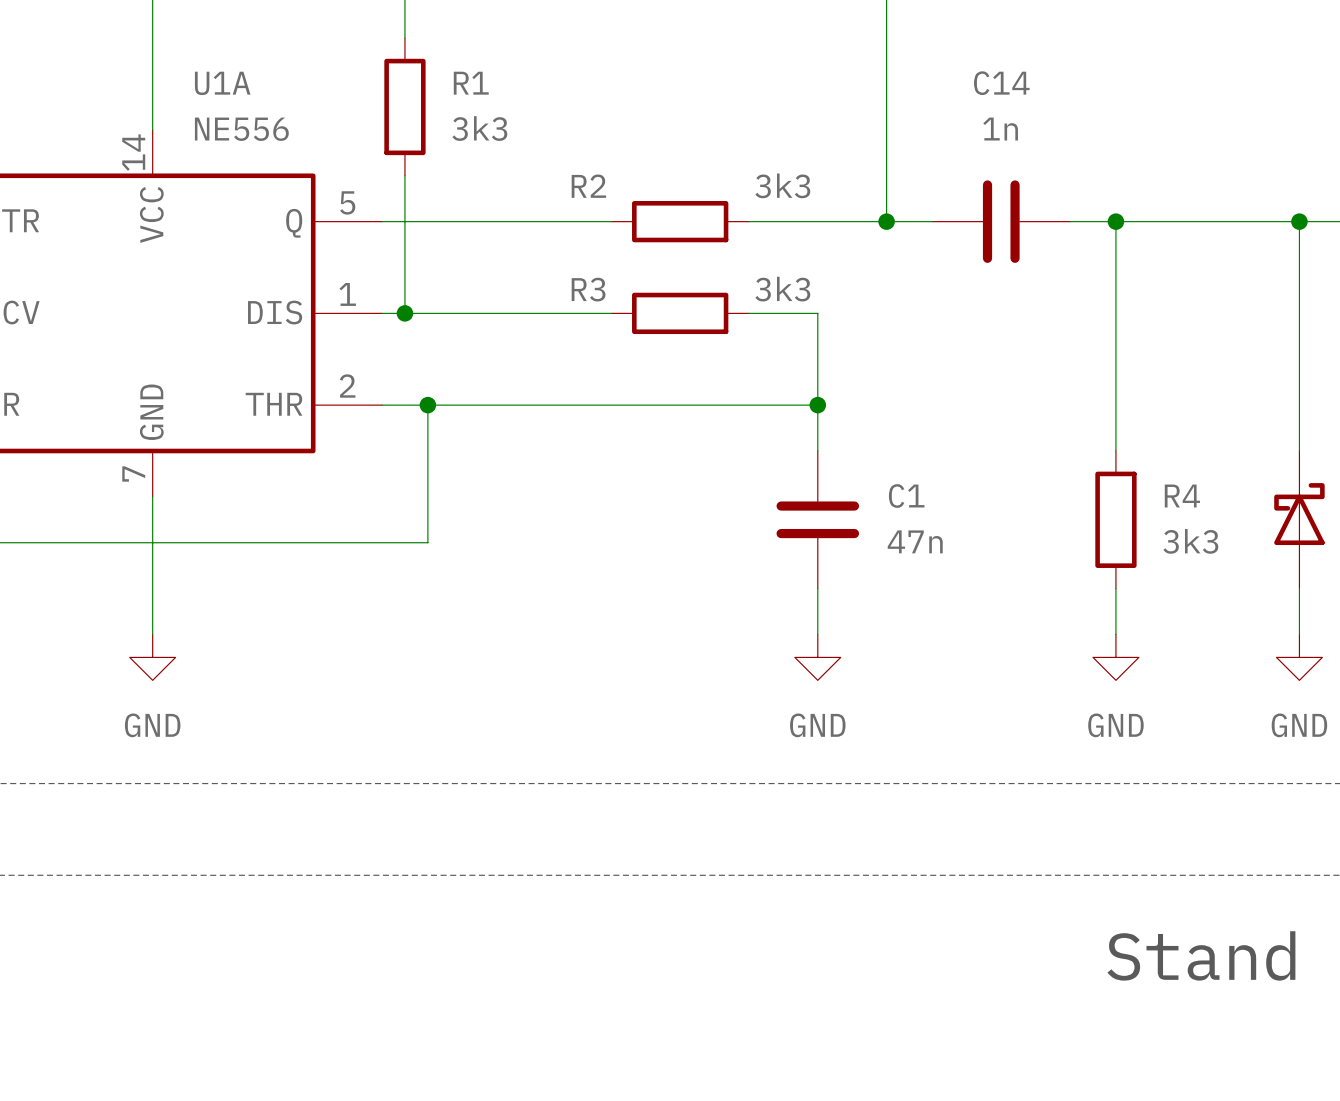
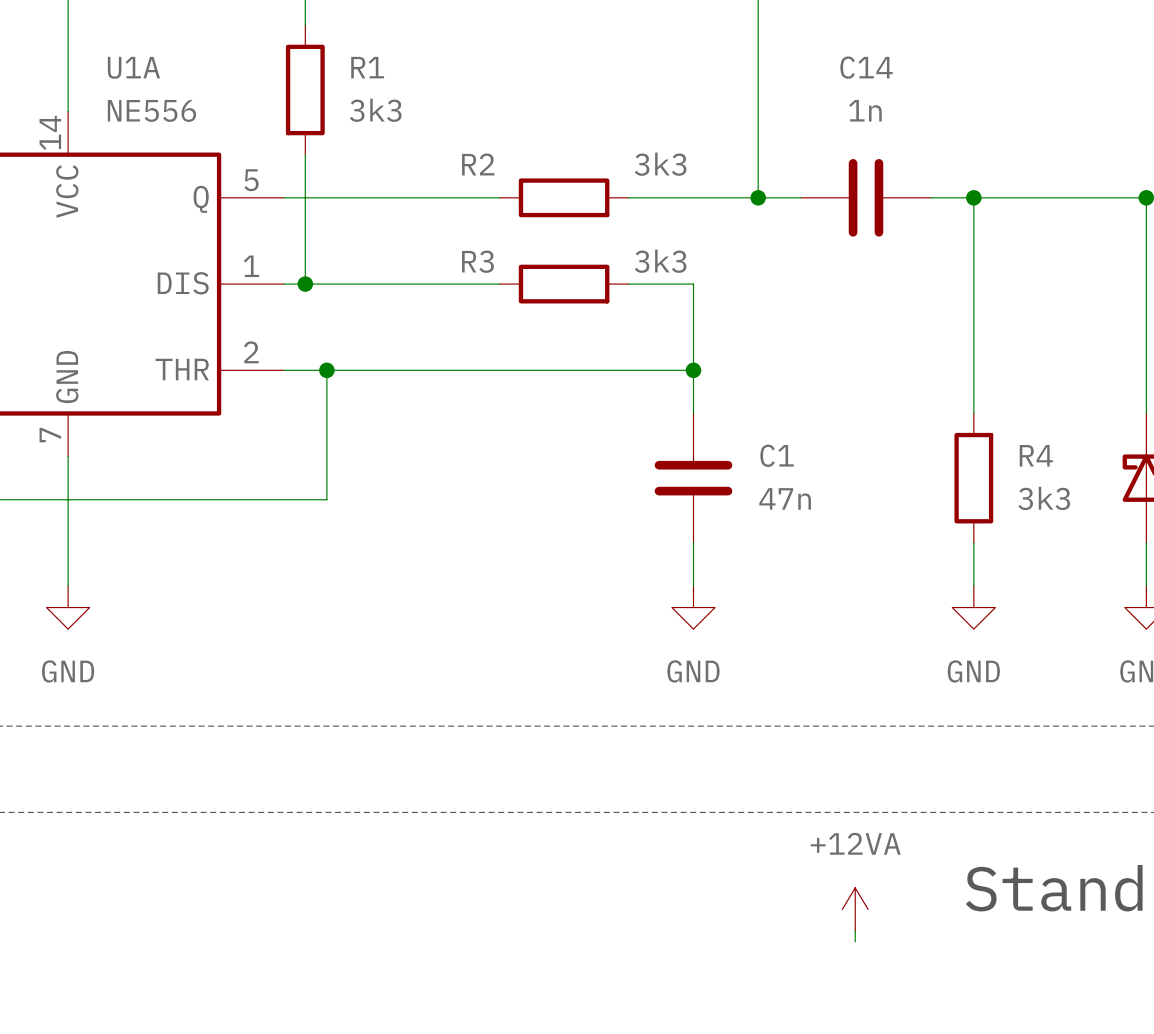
power symbol: none -> +12VA (855, 909)
wire: none -> (855, 931) (855, 941)

